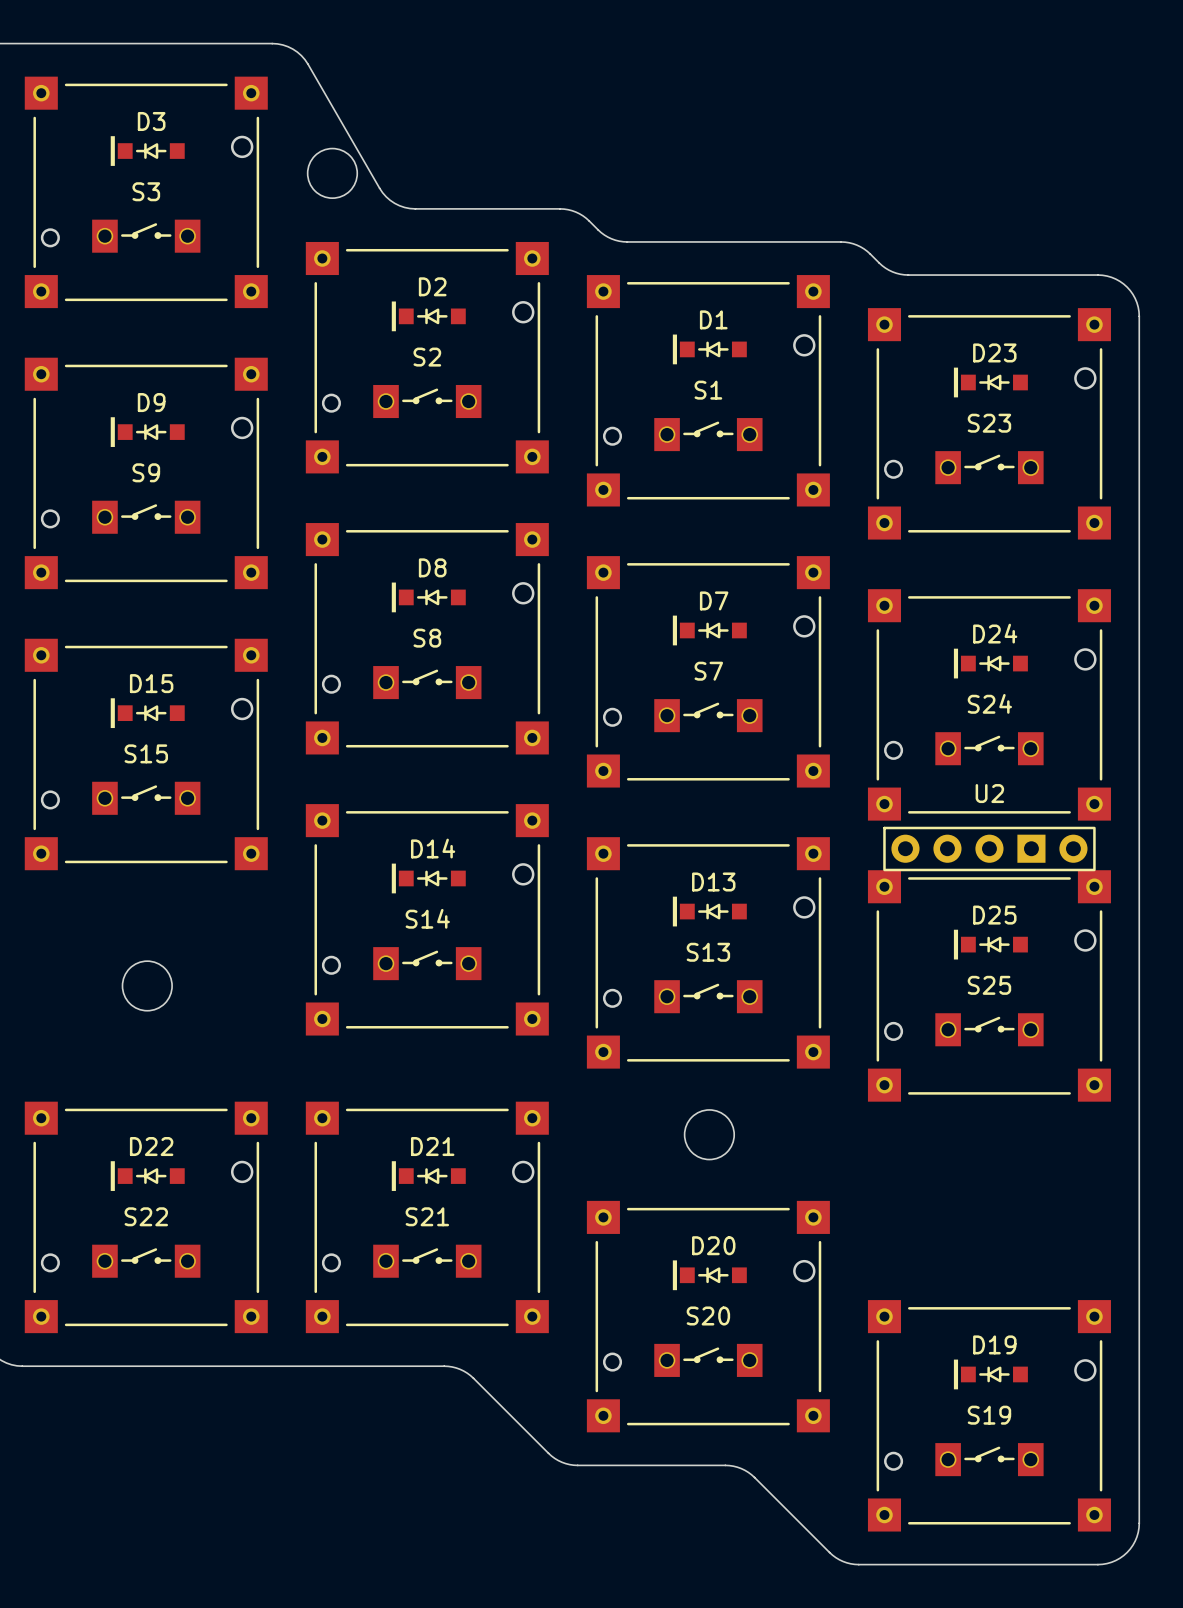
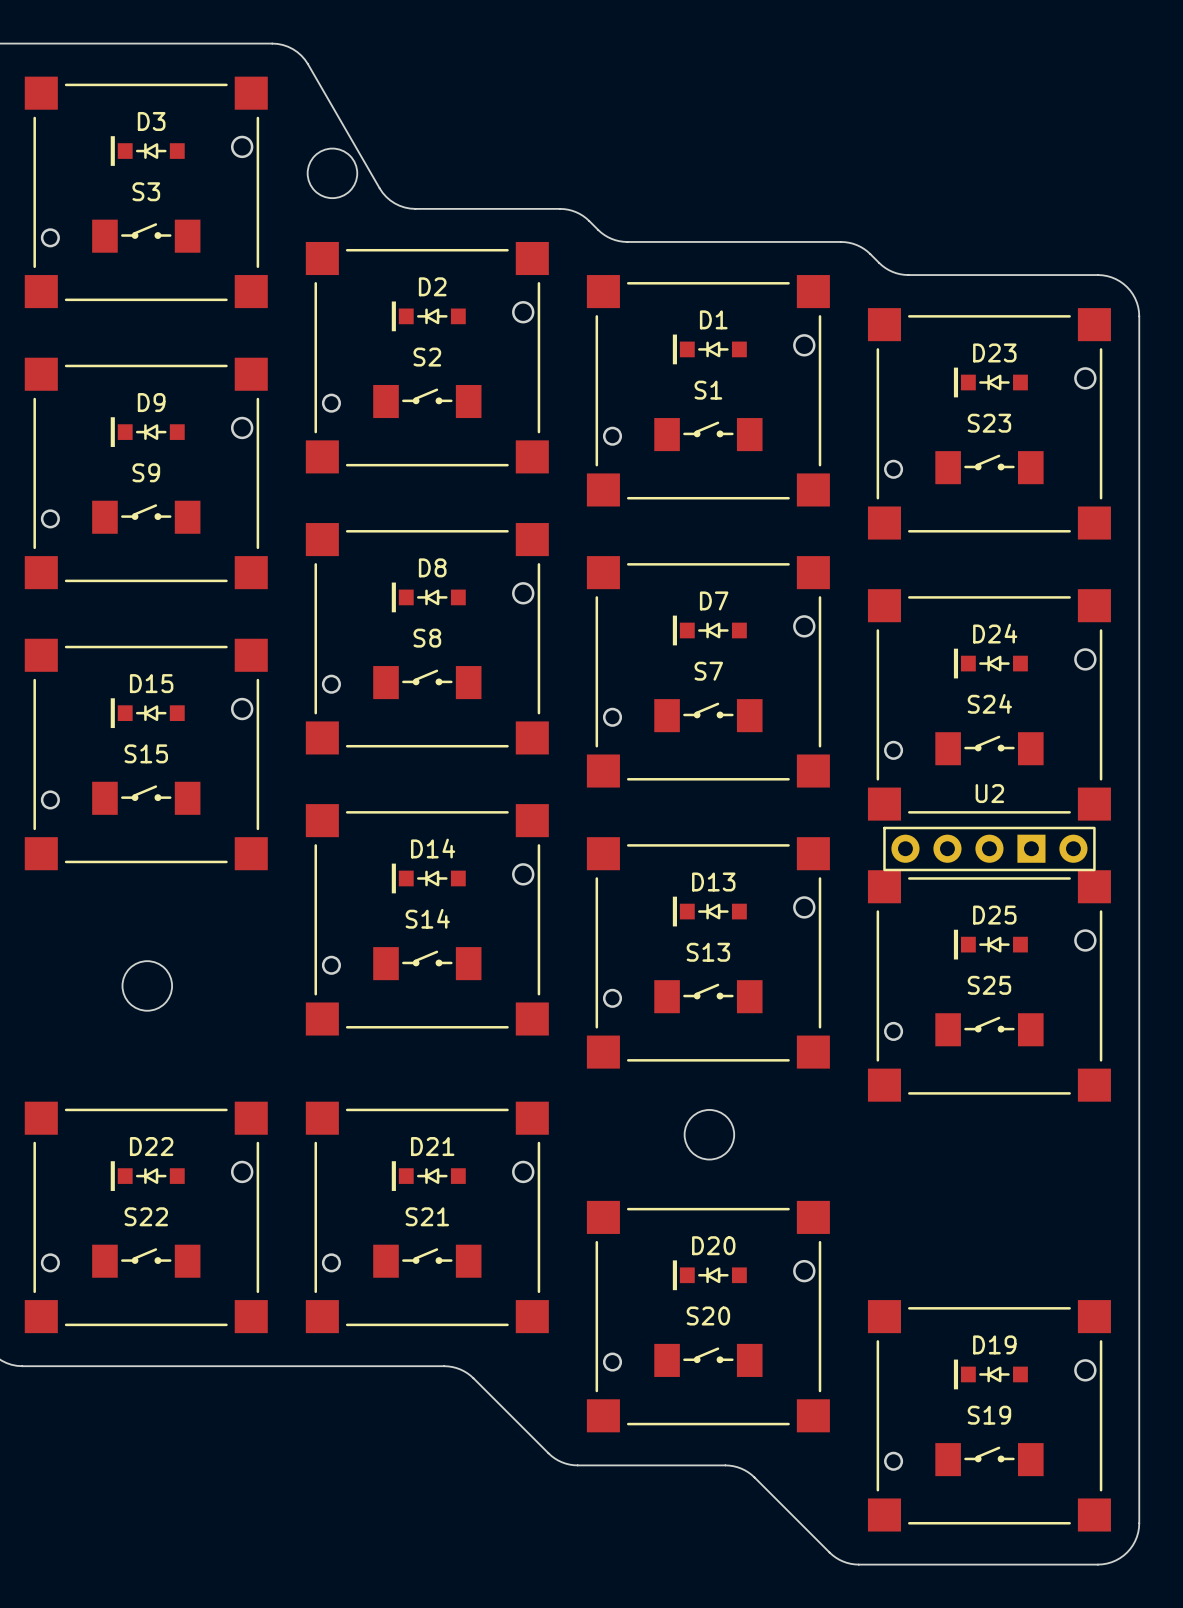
S3 footprint: [24, 76, 268, 309] -> [24, 76, 268, 309]
S2 footprint: [305, 241, 549, 474] -> [305, 241, 549, 474]
S1 footprint: [586, 275, 830, 507] -> [586, 275, 830, 507]
S23 footprint: [867, 308, 1111, 540] -> [867, 308, 1111, 540]
S9 footprint: [24, 357, 268, 590] -> [24, 357, 268, 590]
S8 footprint: [305, 523, 549, 755] -> [305, 523, 549, 755]
S7 footprint: [586, 556, 830, 788] -> [586, 556, 830, 788]
S24 footprint: [867, 589, 1111, 821] -> [867, 589, 1111, 821]
S15 footprint: [24, 638, 268, 871] -> [24, 638, 268, 871]
S14 footprint: [305, 804, 549, 1036] -> [305, 804, 549, 1036]
S13 footprint: [586, 837, 830, 1069] -> [586, 837, 830, 1069]
S25 footprint: [867, 870, 1111, 1102] -> [867, 870, 1111, 1102]
S22 footprint: [24, 1101, 268, 1334] -> [24, 1101, 268, 1334]
S21 footprint: [305, 1101, 549, 1334] -> [305, 1101, 549, 1334]
S20 footprint: [586, 1200, 830, 1433] -> [586, 1200, 830, 1433]
S19 footprint: [867, 1300, 1111, 1532] -> [867, 1300, 1111, 1532]

